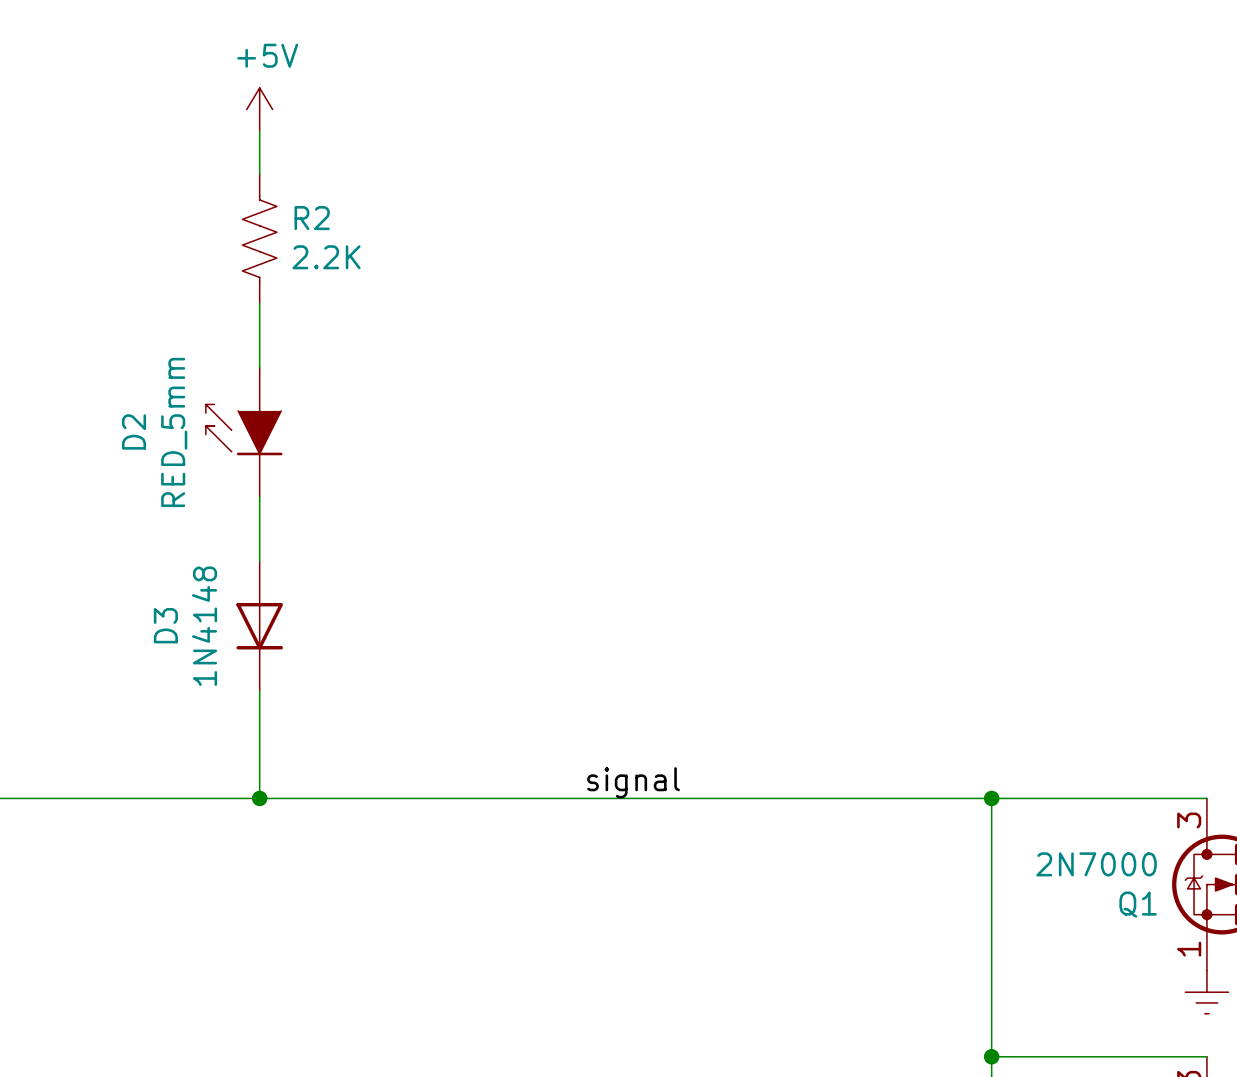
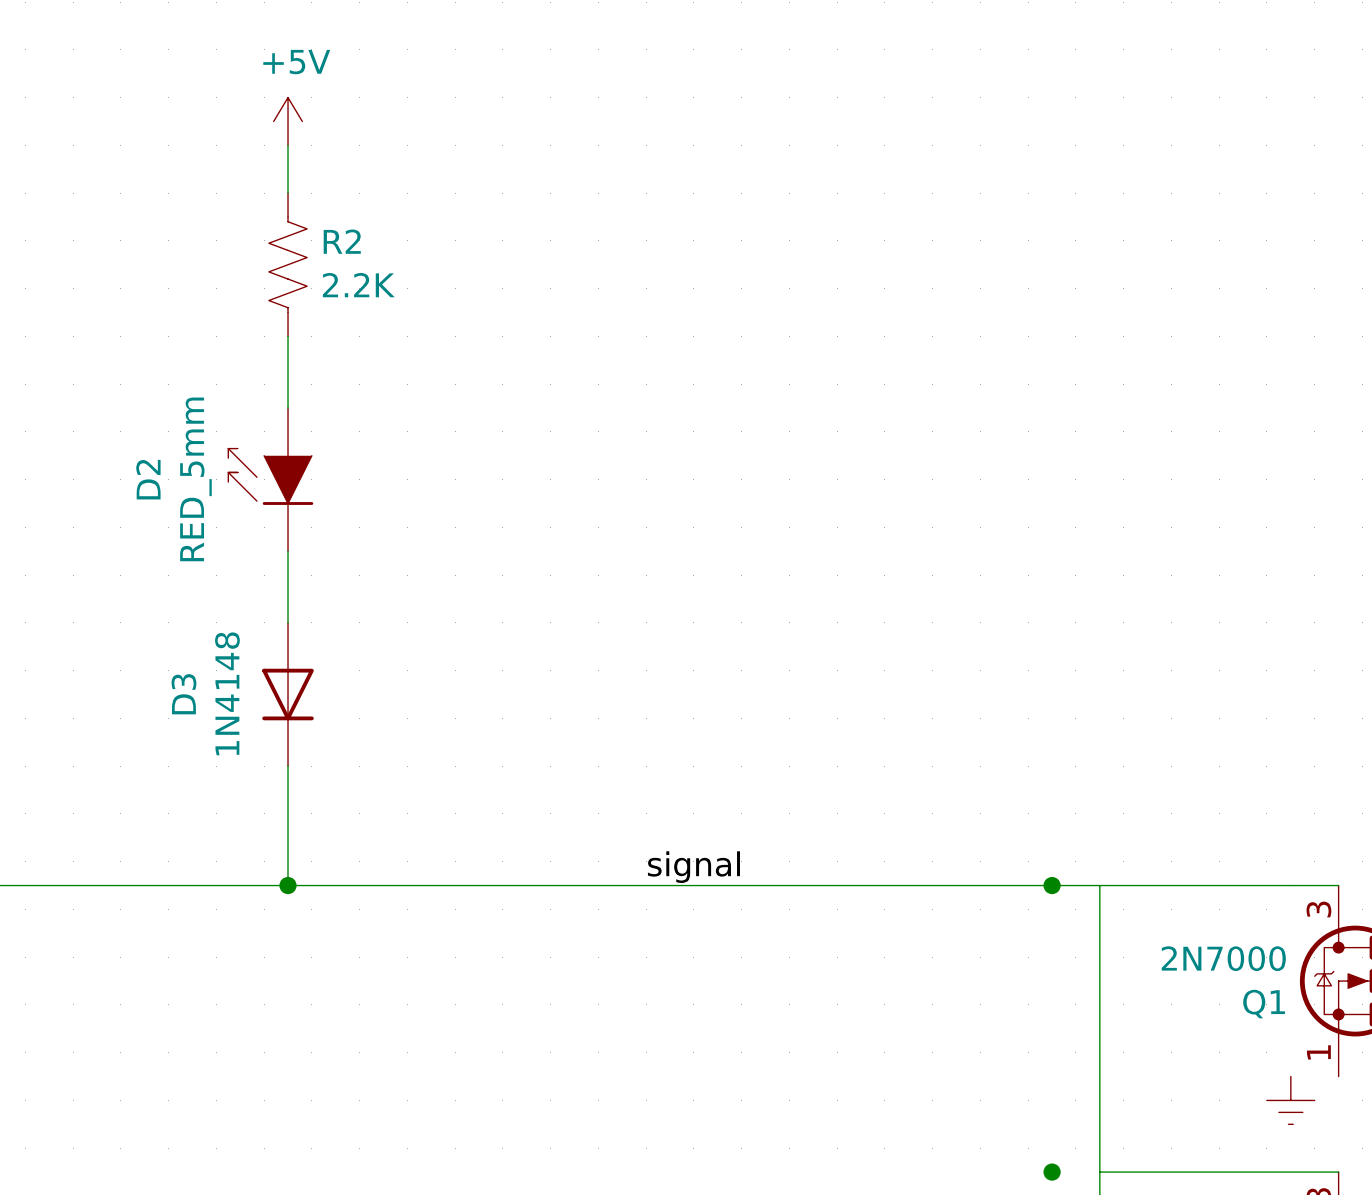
junction position: (991, 798) -> (1052, 885)
power symbol: none -> (1290, 1100)
power symbol: (1206, 992) -> none
junction position: (991, 1056) -> (1052, 1172)

